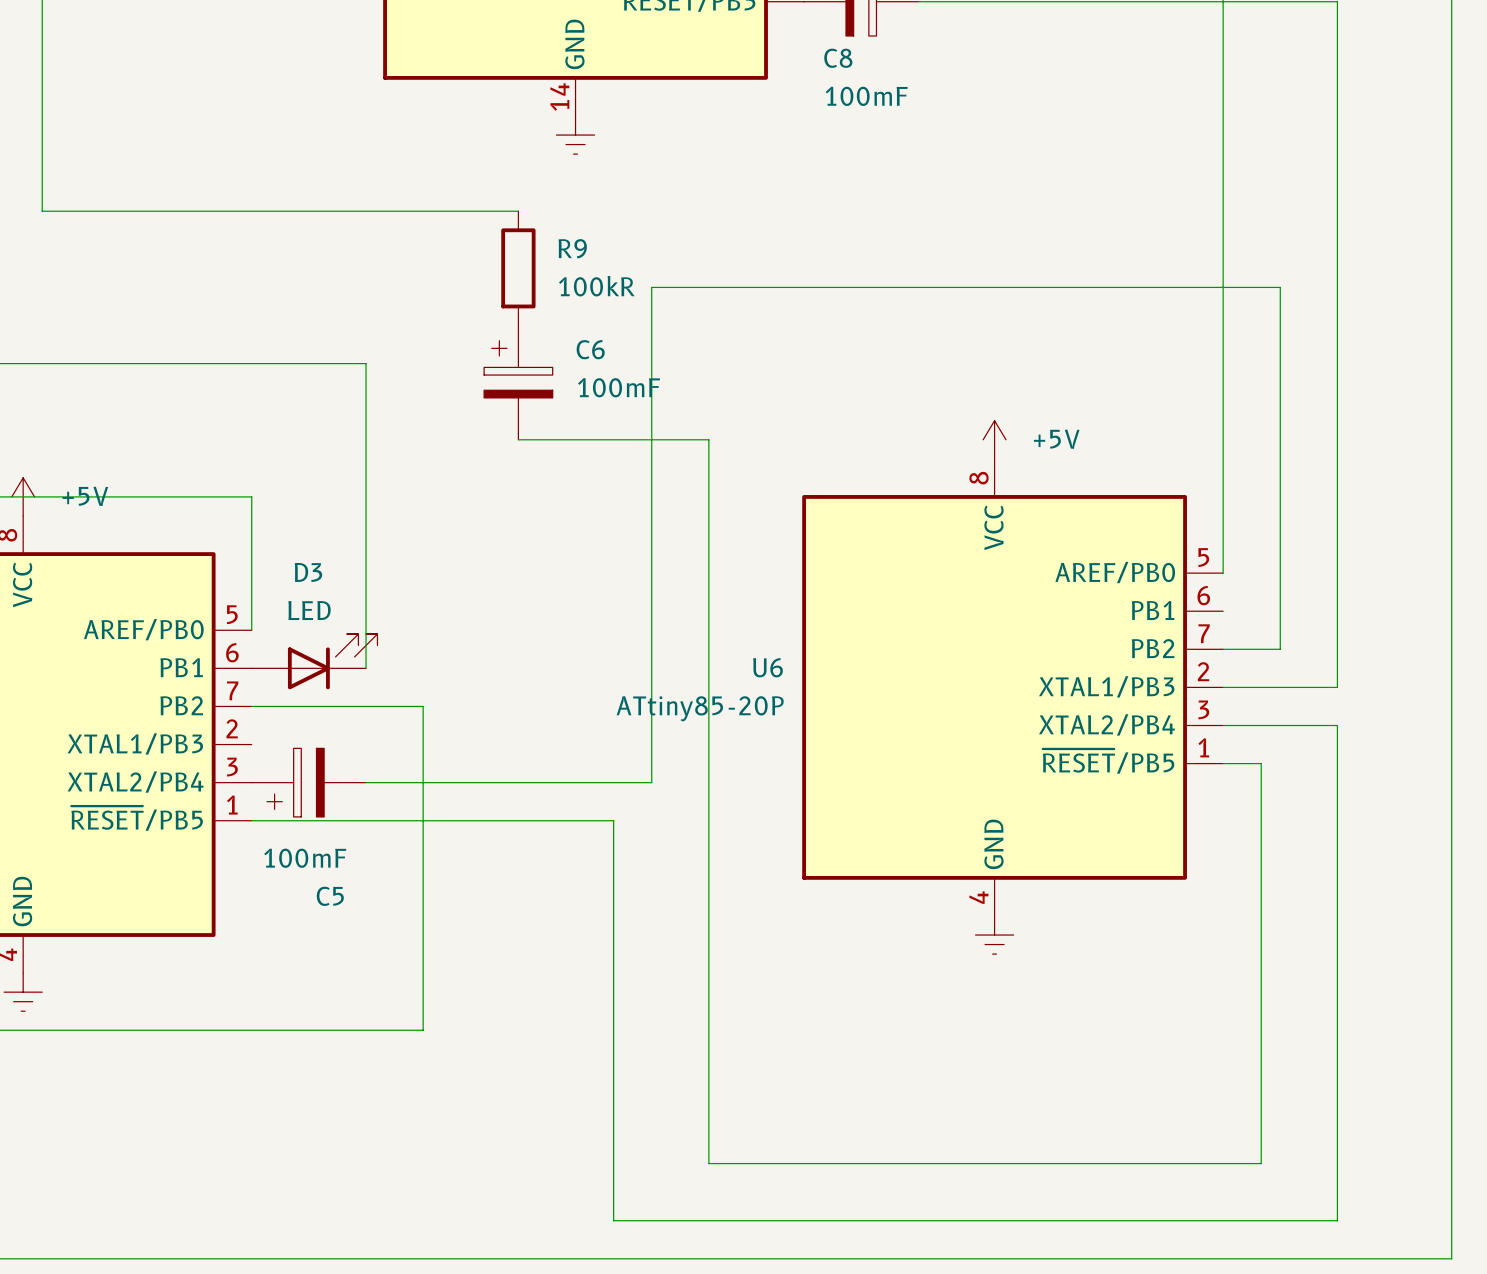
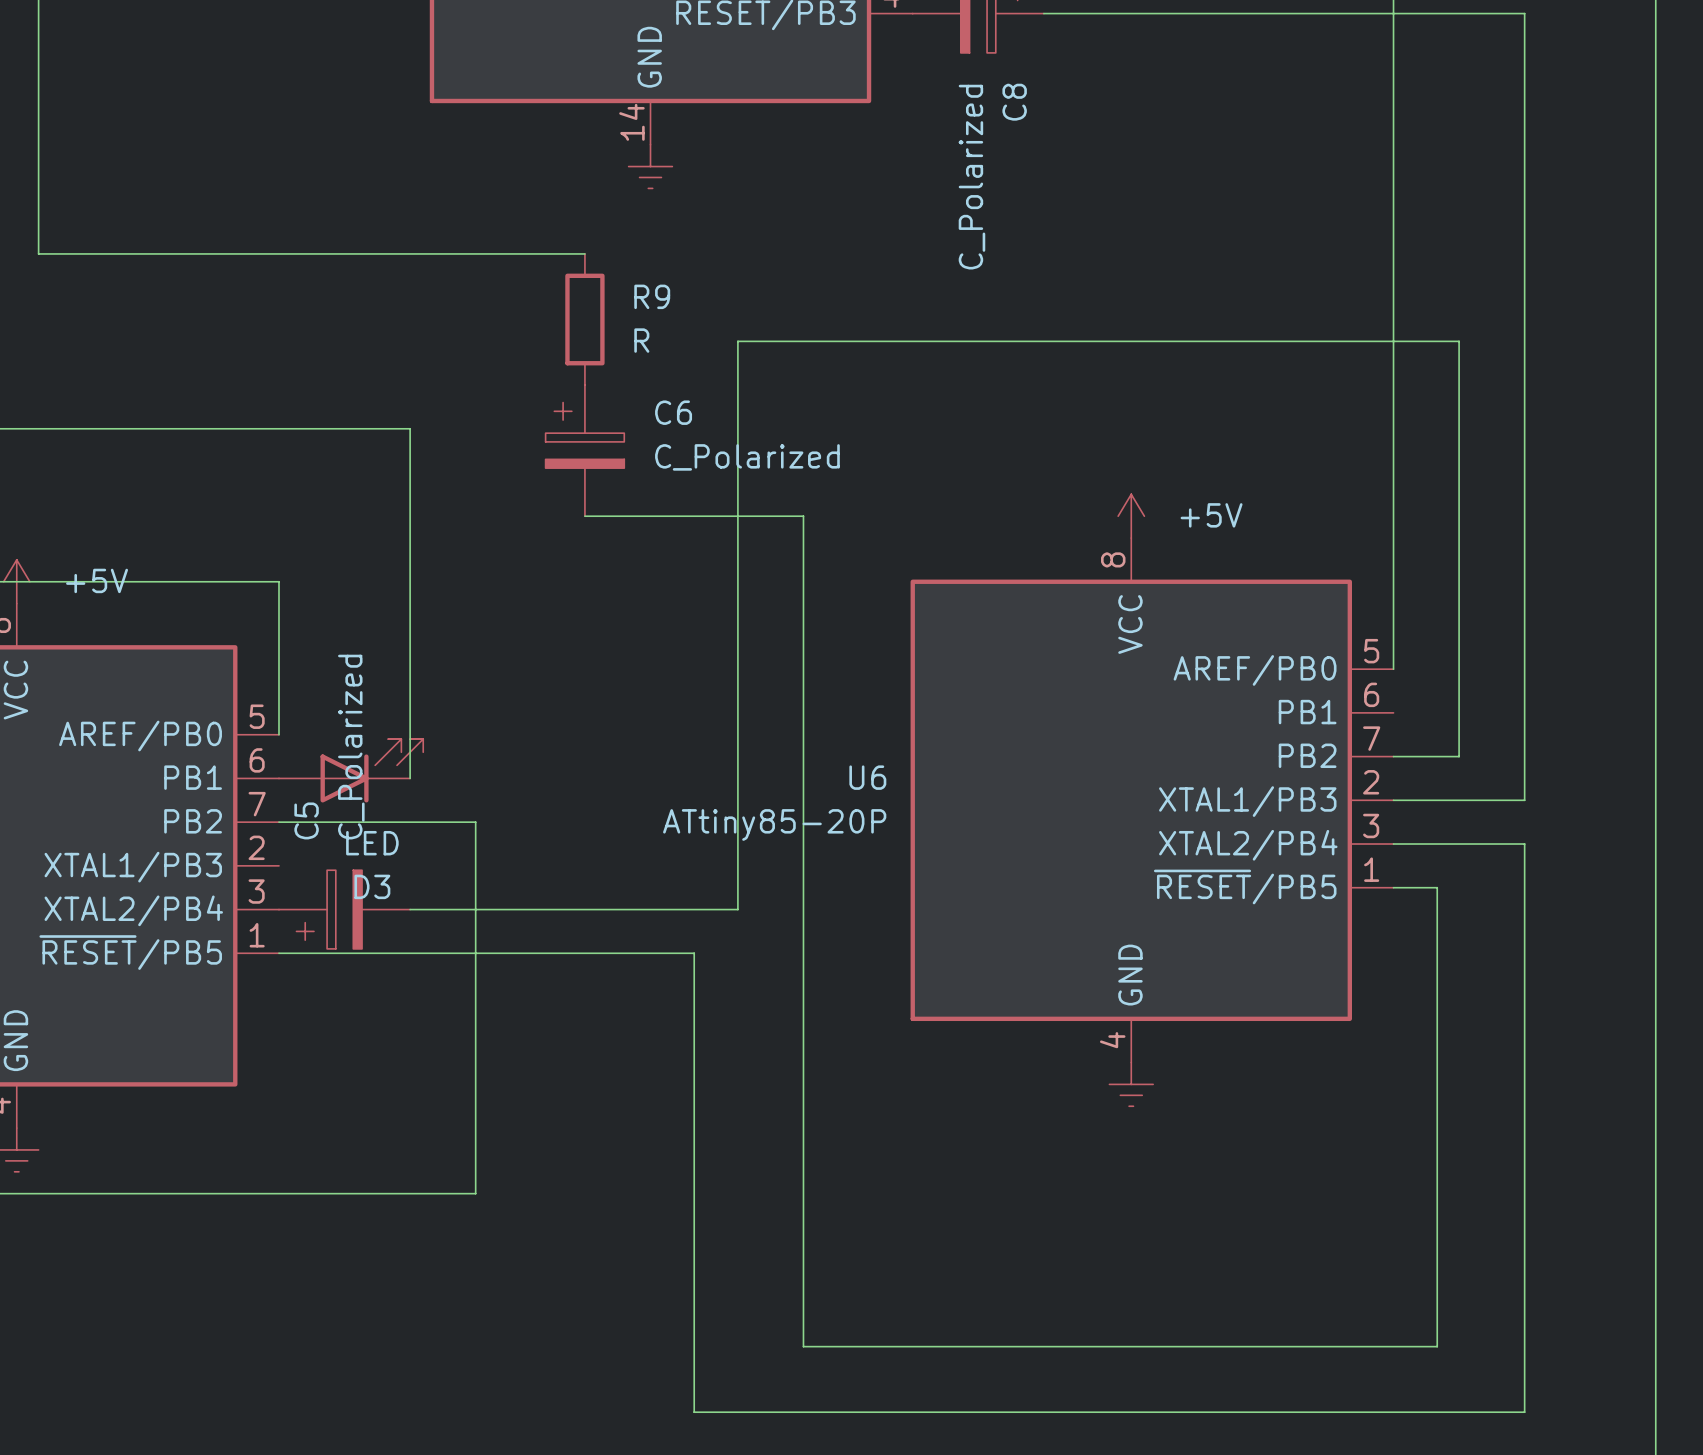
C8 name rotation: 0° (838, 58) -> 90° counterclockwise (1014, 102)
C8 name position: C8 (838, 58) -> C8 (1014, 102)
C8 value: 100mF (866, 96) -> C_Polarized (971, 177)
R9 value: 100kR (596, 286) -> R (641, 340)
C6 value: 100mF (619, 387) -> C_Polarized (747, 457)
D3 name position: D3 (308, 572) -> D3 (372, 886)
D3 value position: LED (309, 610) -> LED (372, 843)
C5 value: 100mF (305, 858) -> C_Polarized (351, 747)
C5 name rotation: 0° (330, 896) -> 90° counterclockwise (306, 820)
C5 name position: C5 (330, 896) -> C5 (306, 820)

